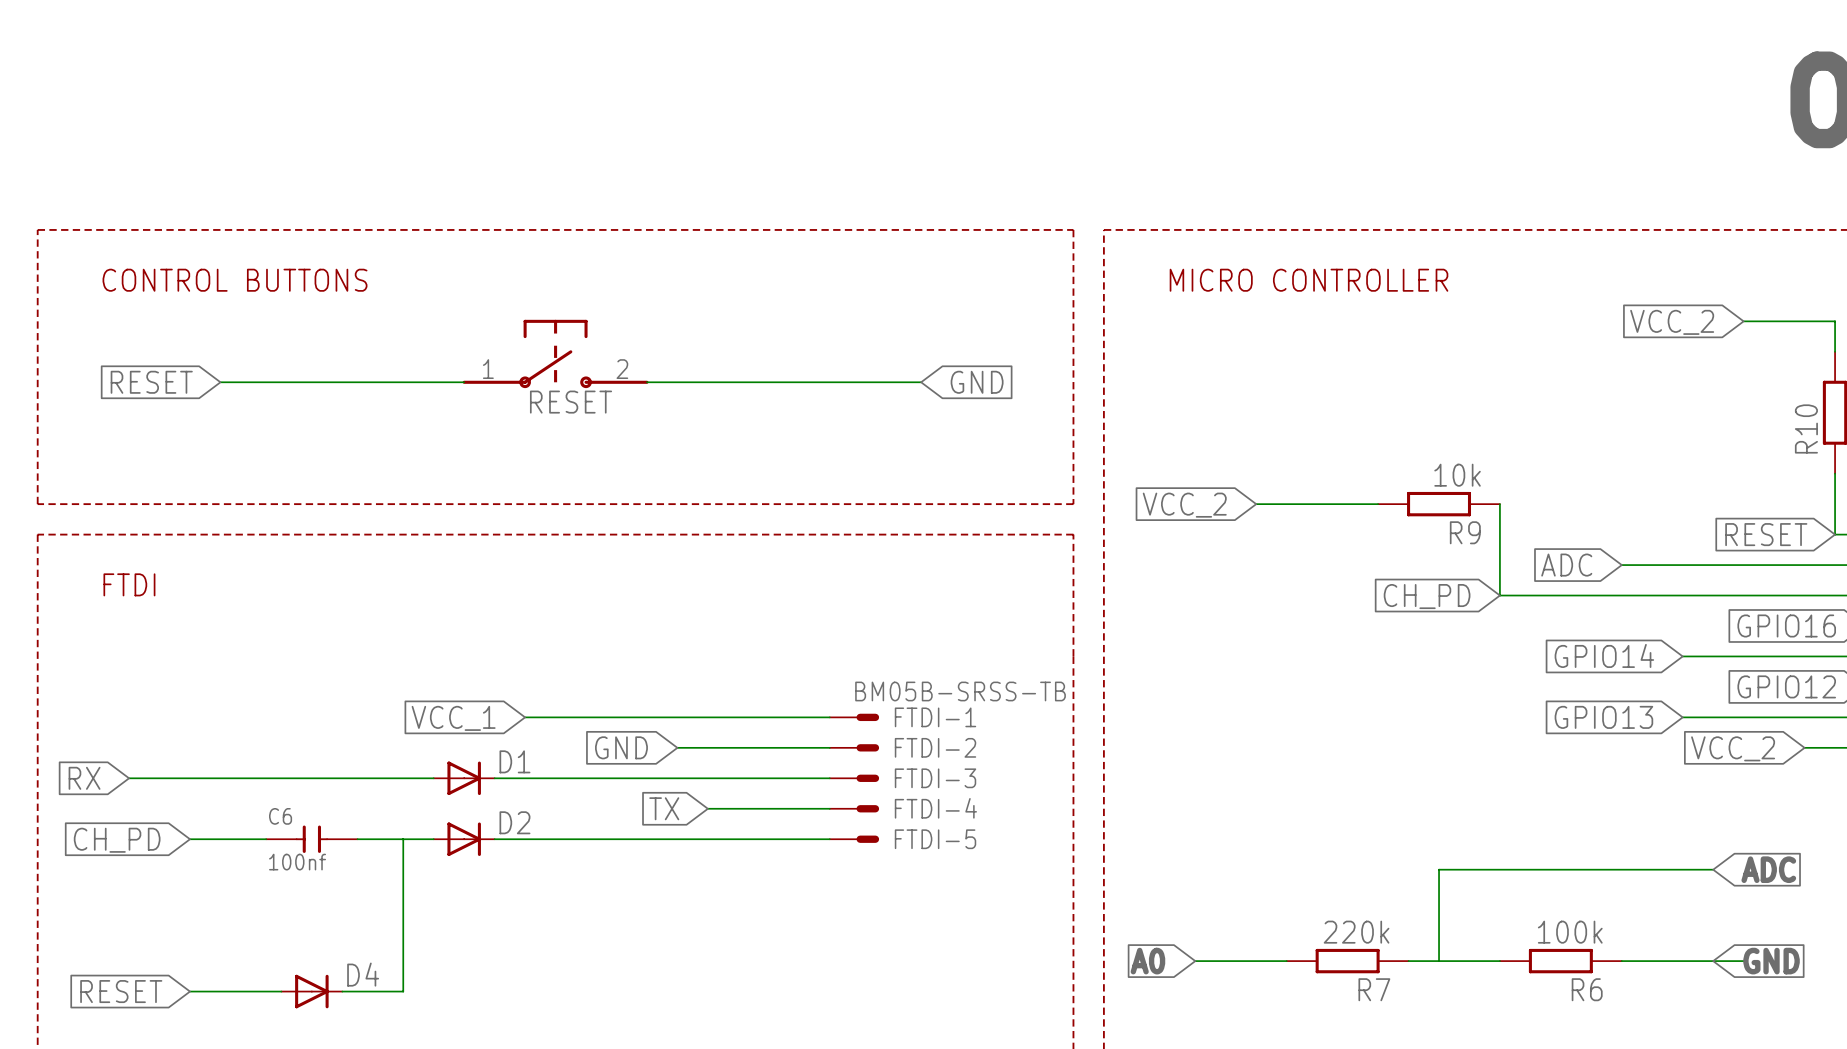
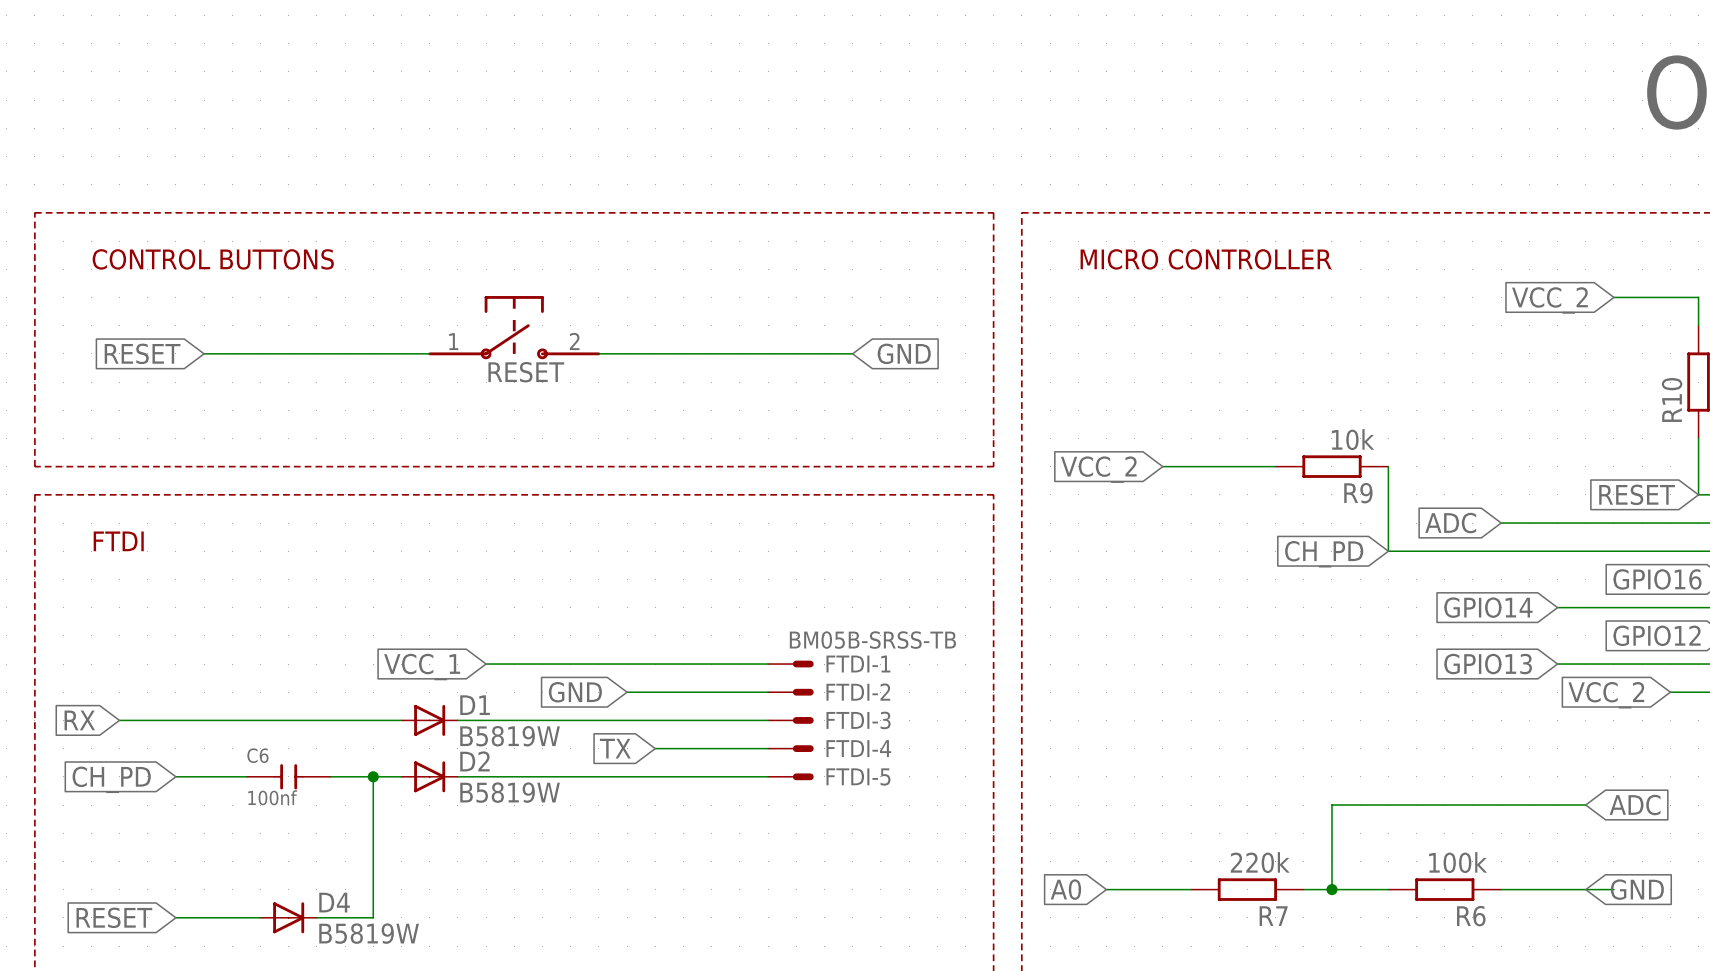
D1 value: none -> B5819W (510, 736)
junction: none -> (373, 776)
D2 value: none -> B5819W (510, 792)
junction: none -> (1331, 889)
D4 value: none -> B5819W (369, 933)

